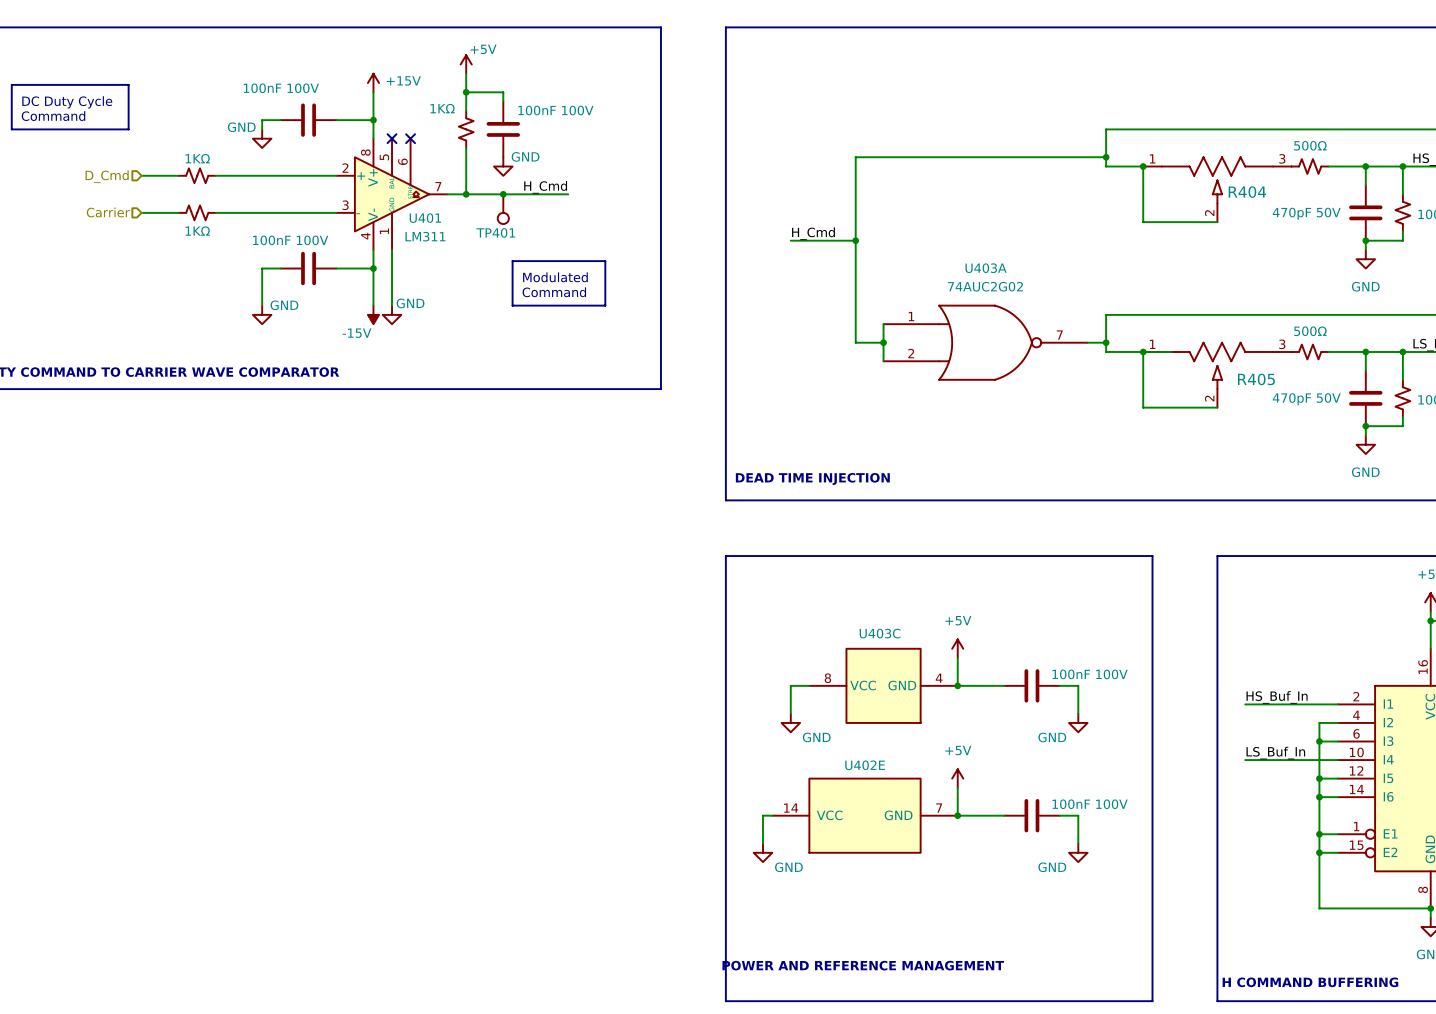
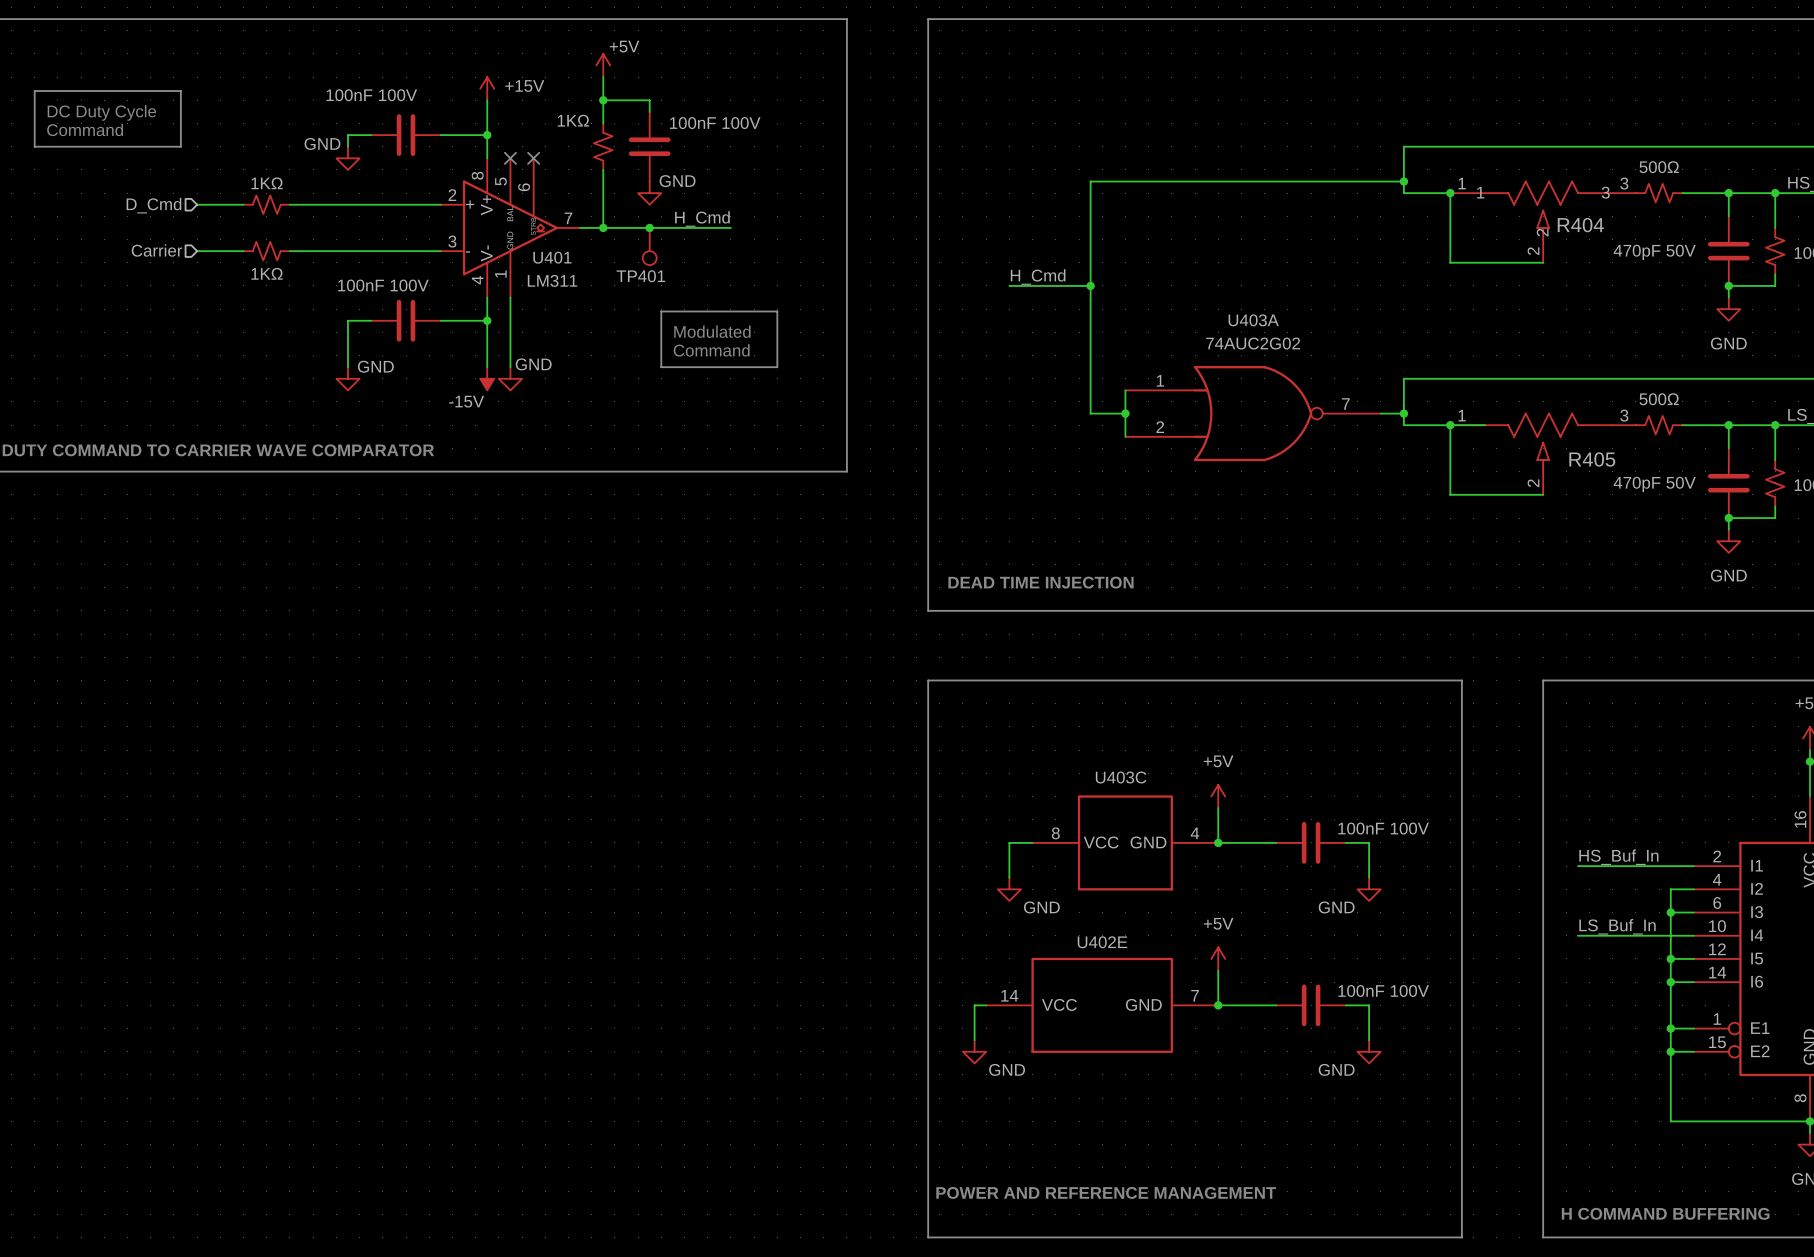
R404 pin name: none -> 1 (1480, 192)
R404 pin name: none -> 3 (1605, 192)
R404 pin name: none -> 2 (1542, 232)

